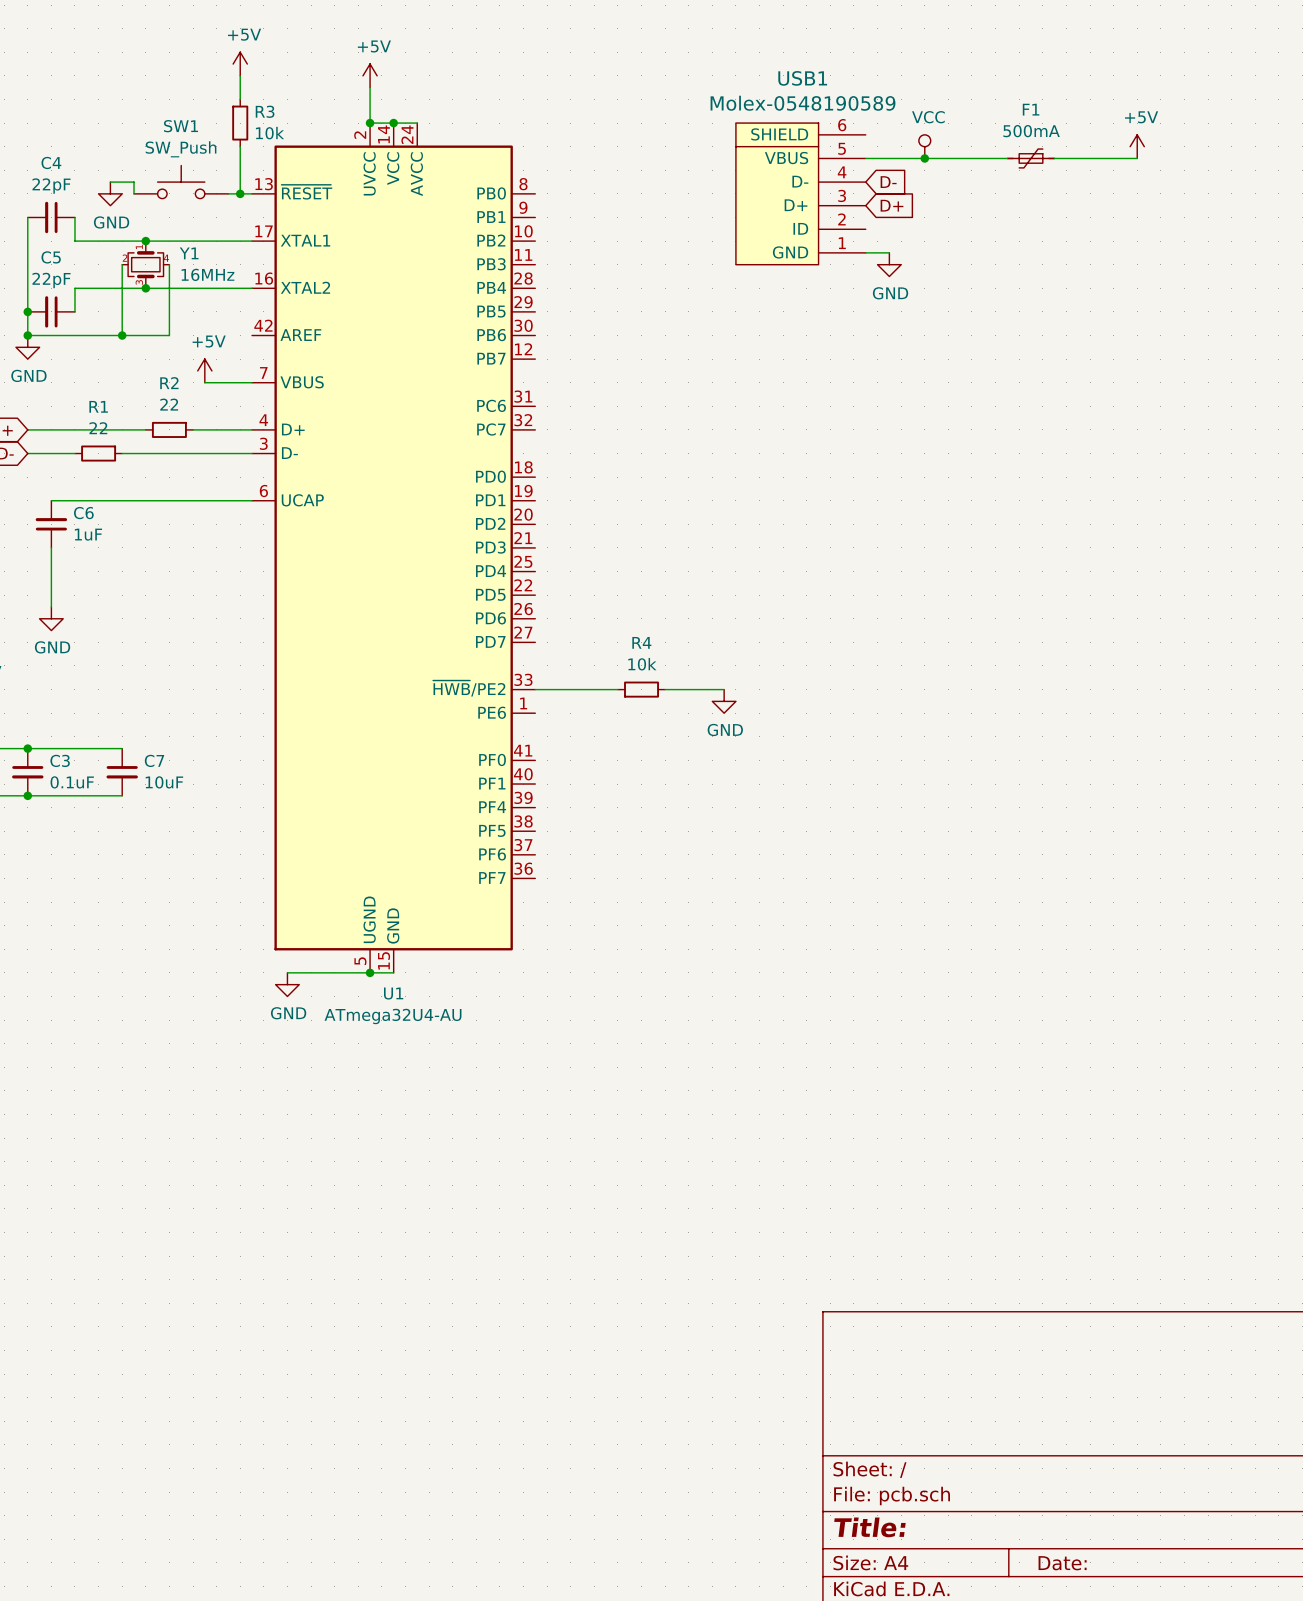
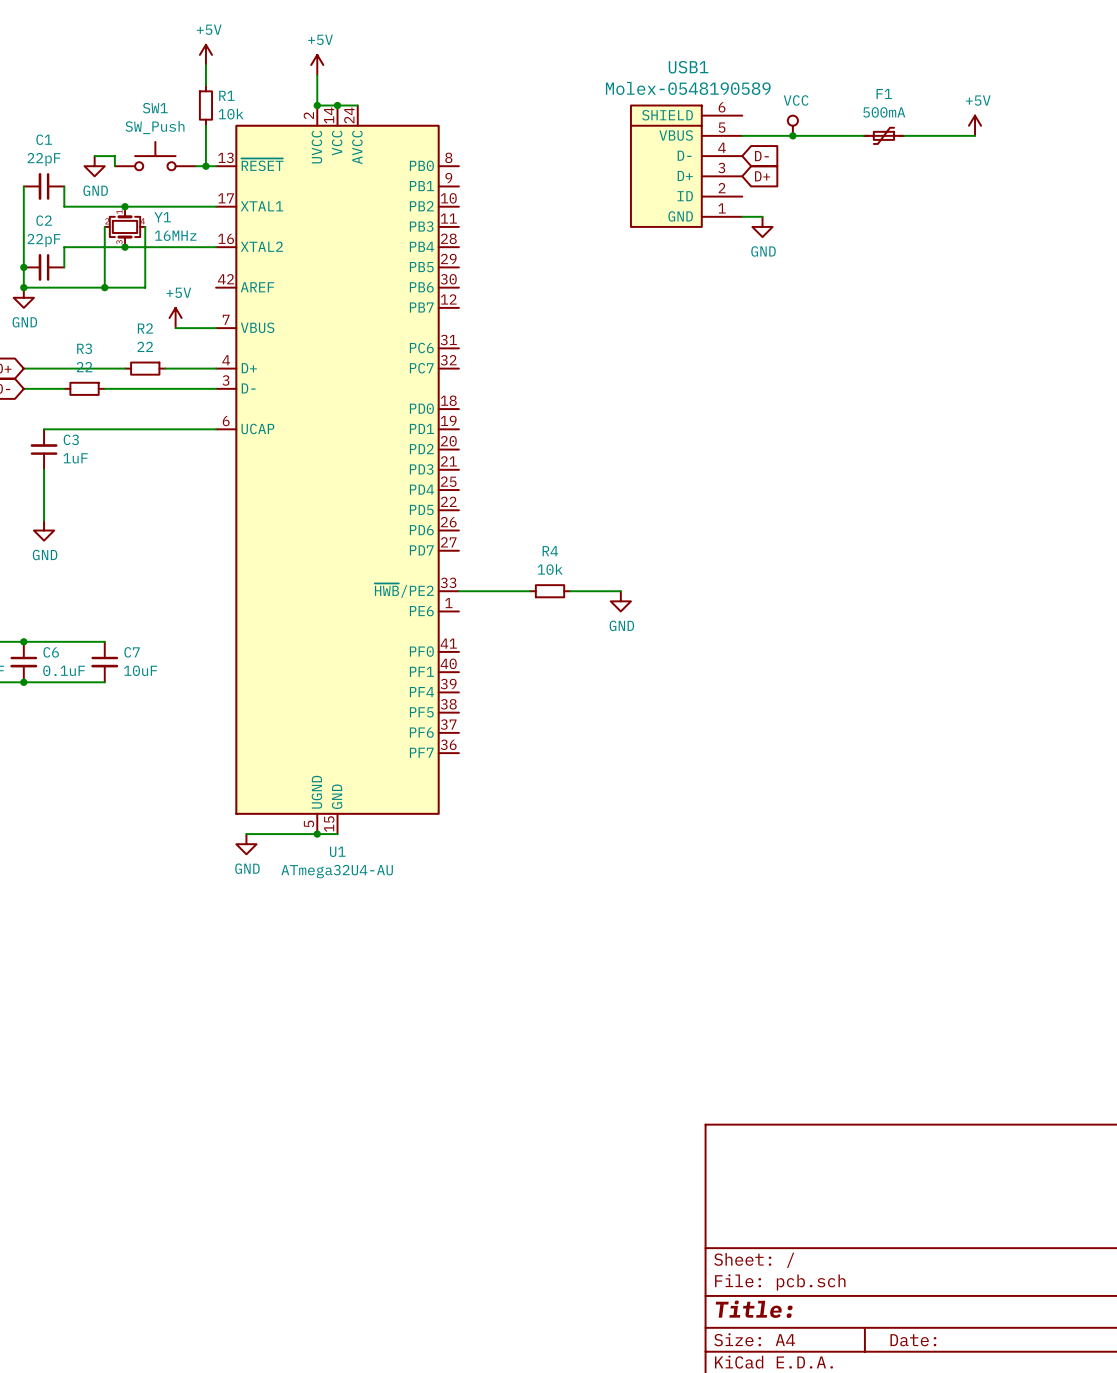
R3 name: R3 (265, 111) -> R1 (226, 95)
C4 name: C4 (51, 162) -> C1 (44, 139)
C5 name: C5 (51, 257) -> C2 (44, 220)
R1 name: R1 (98, 406) -> R3 (84, 348)
C6 name: C6 (83, 513) -> C3 (71, 439)
C3 name: C3 (60, 760) -> C6 (51, 652)

